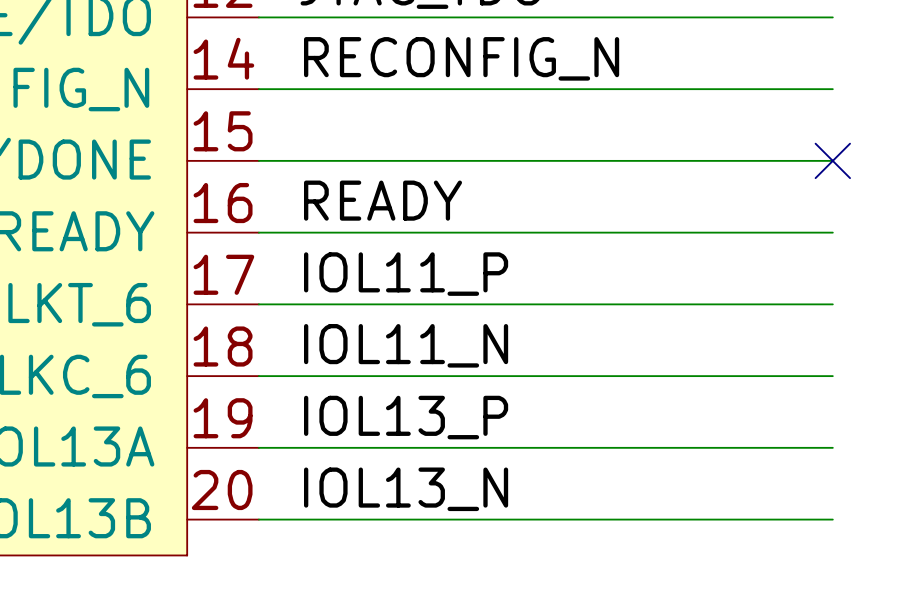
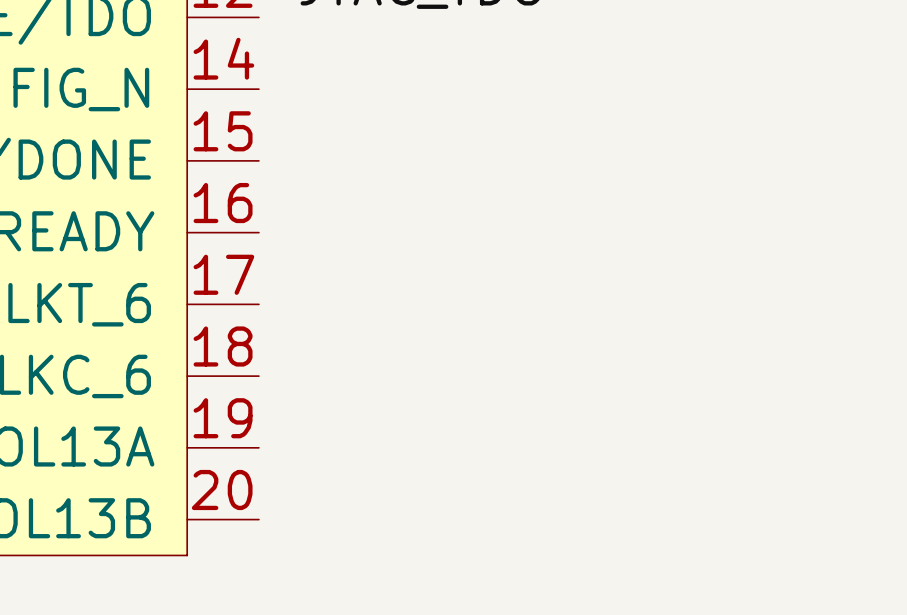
wire: (258, 17) (832, 17) -> none
label: RECONFIG_N (461, 58) -> none
wire: (258, 89) (832, 89) -> none
wire: (258, 160) (832, 160) -> none
no-connect mark: (832, 160) -> none
label: READY (383, 200) -> none
wire: (258, 232) (832, 232) -> none
label: IOL11_P (406, 274) -> none
wire: (258, 304) (832, 304) -> none
label: IOL11_N (406, 345) -> none
wire: (258, 376) (832, 376) -> none
label: IOL13_P (406, 417) -> none
wire: (258, 447) (832, 447) -> none
label: IOL13_N (406, 489) -> none
wire: (258, 519) (832, 519) -> none

